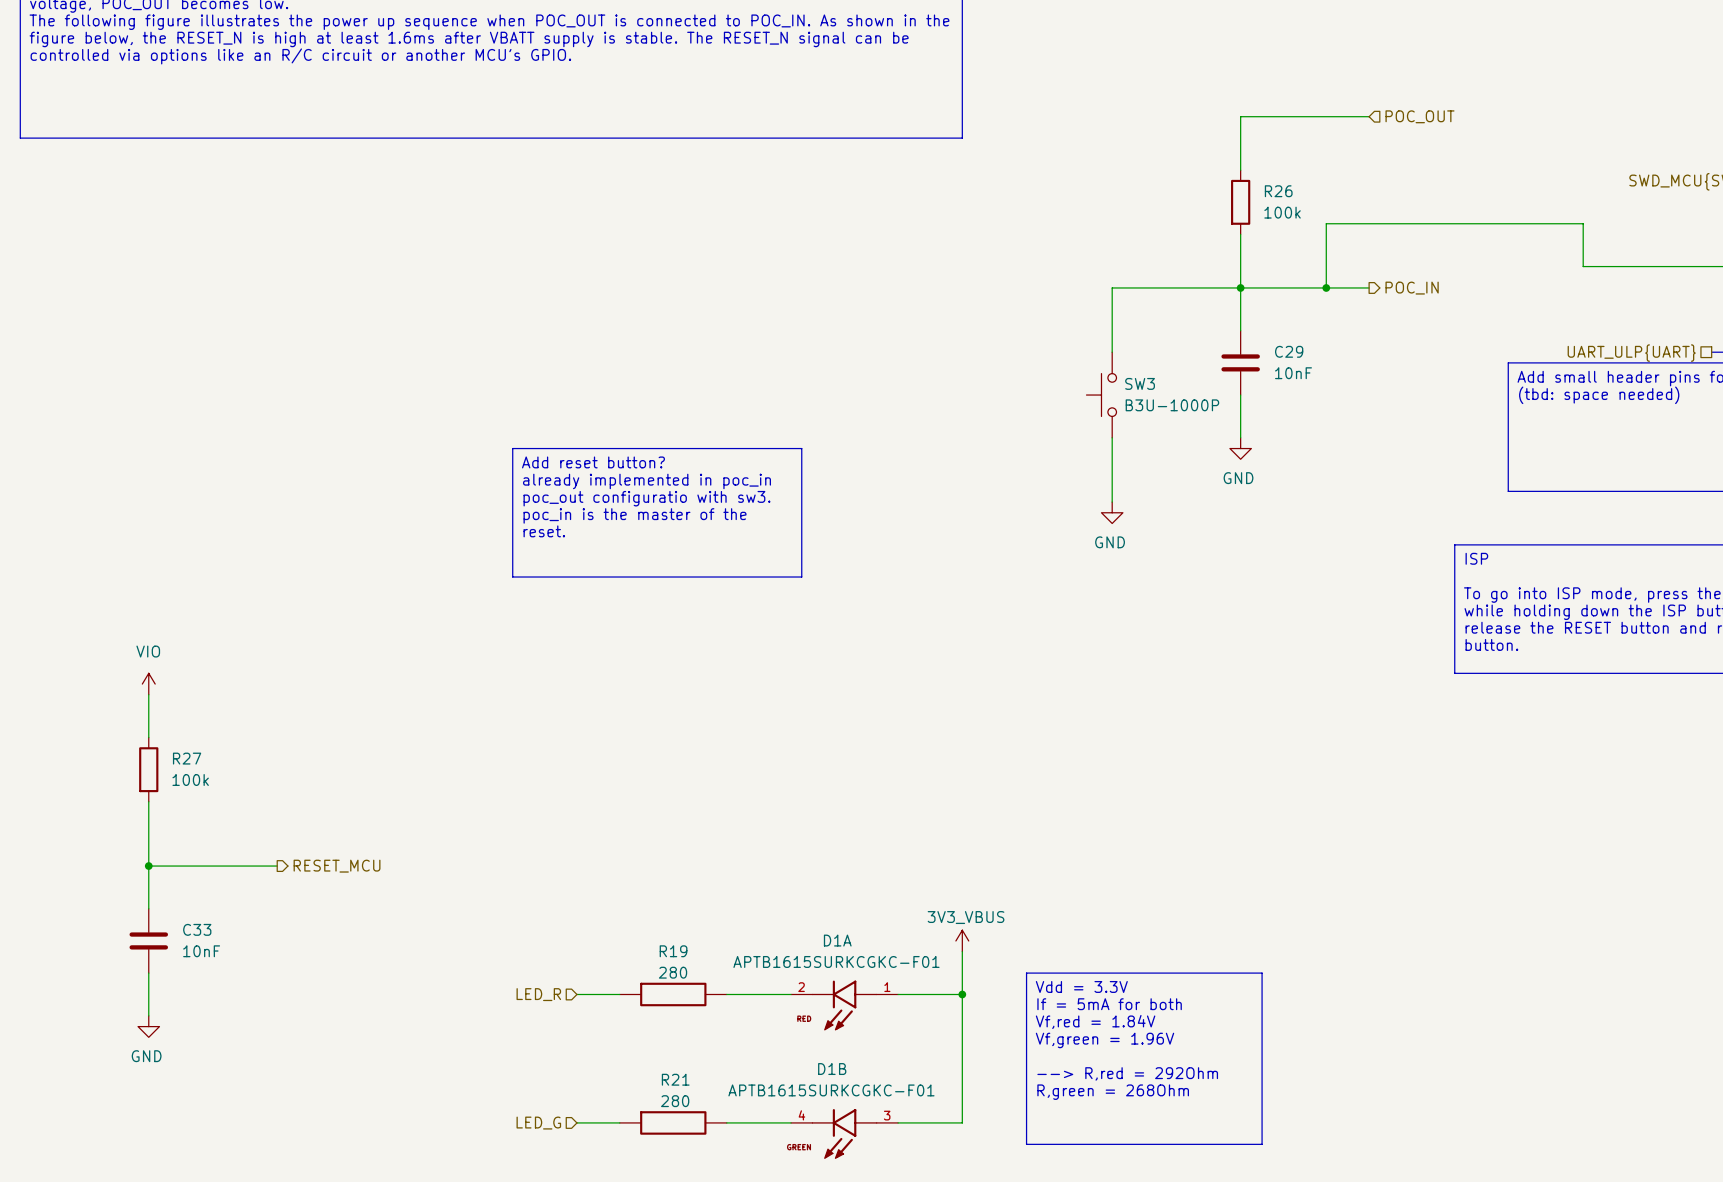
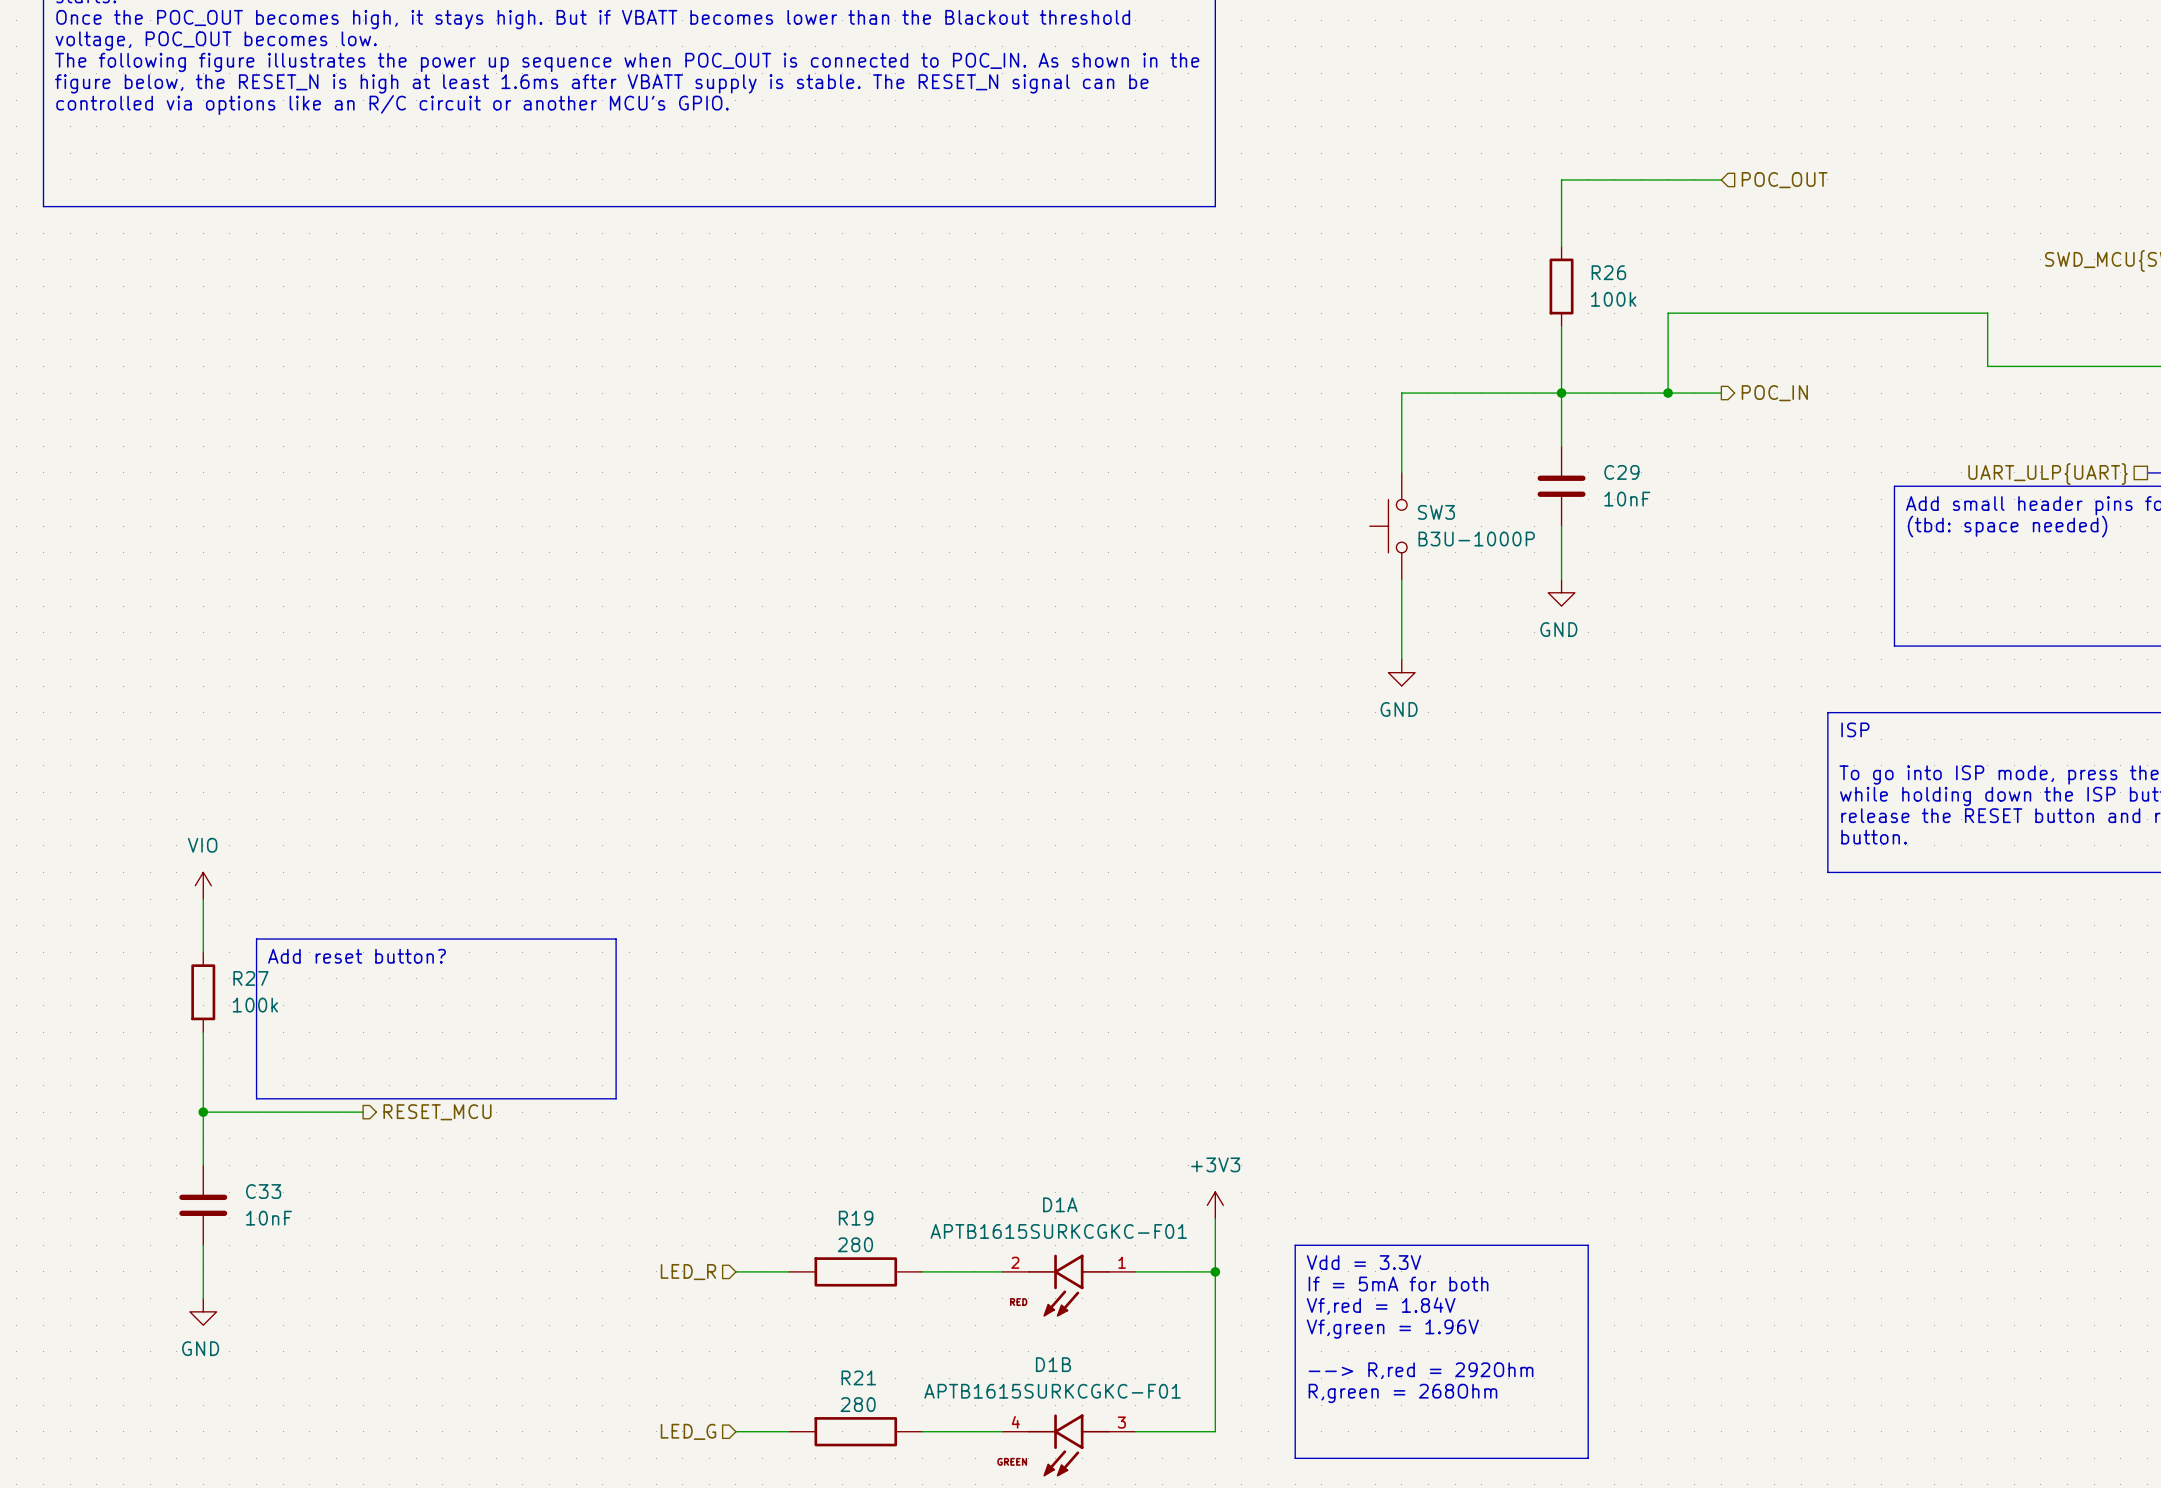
line: (512, 448) (801, 448) (801, 577) (512, 577) (512, 448) -> none
text: Add reset button? (593, 462) -> none
text: already implemented in poc_in (646, 481) -> none
text: poc_out configuratio with sw3. (646, 498) -> none
text: poc_in is the master of the (635, 515) -> none
text: reset. (544, 531) -> none
line: none -> (256, 939) (616, 939) (616, 1098) (256, 1098) (256, 939)
text: none -> Add reset button? (357, 956)
power symbol: 3V3_VBUS (962, 940) -> +3V3 (1215, 1205)

